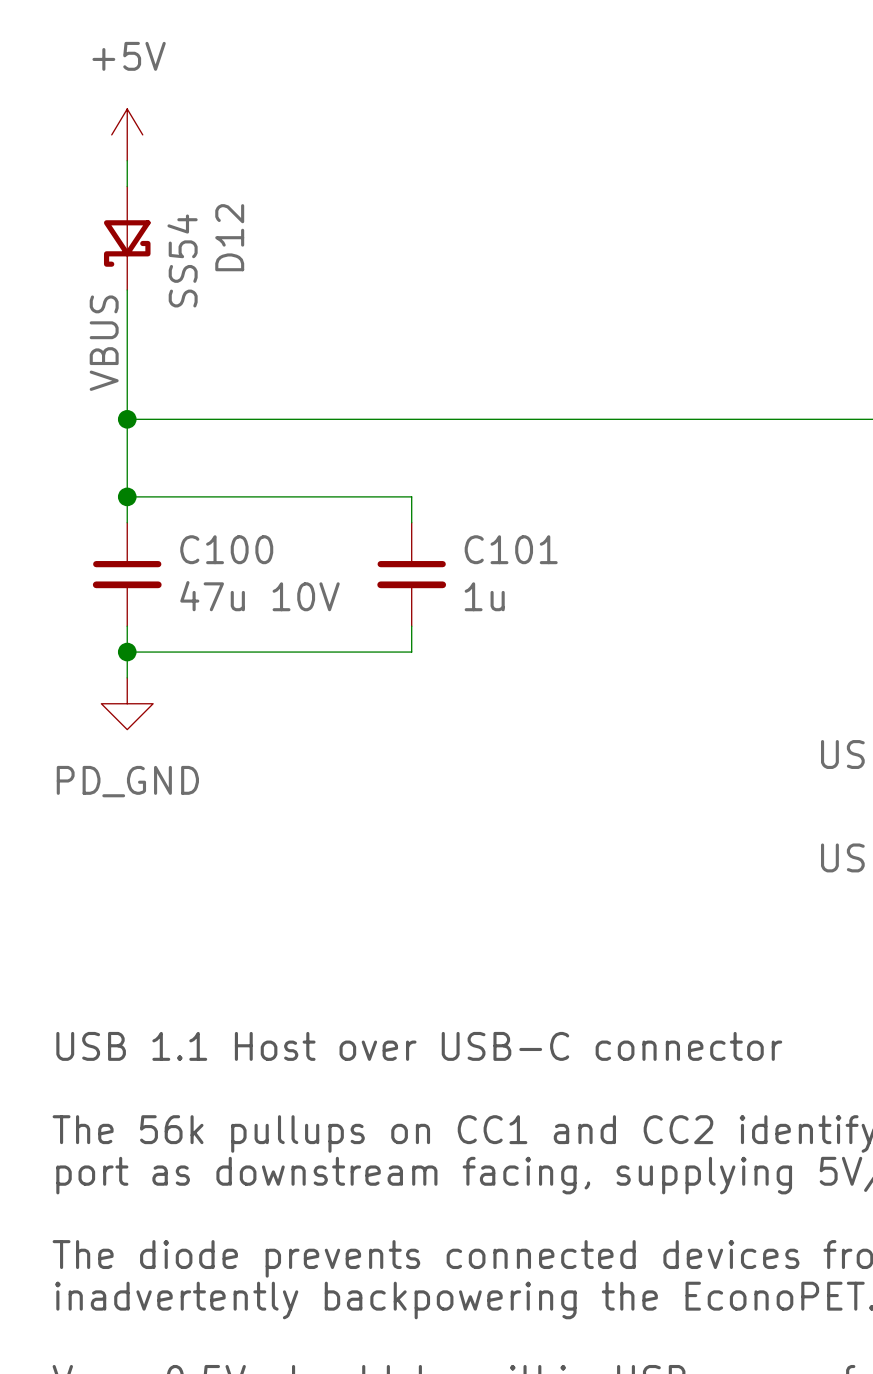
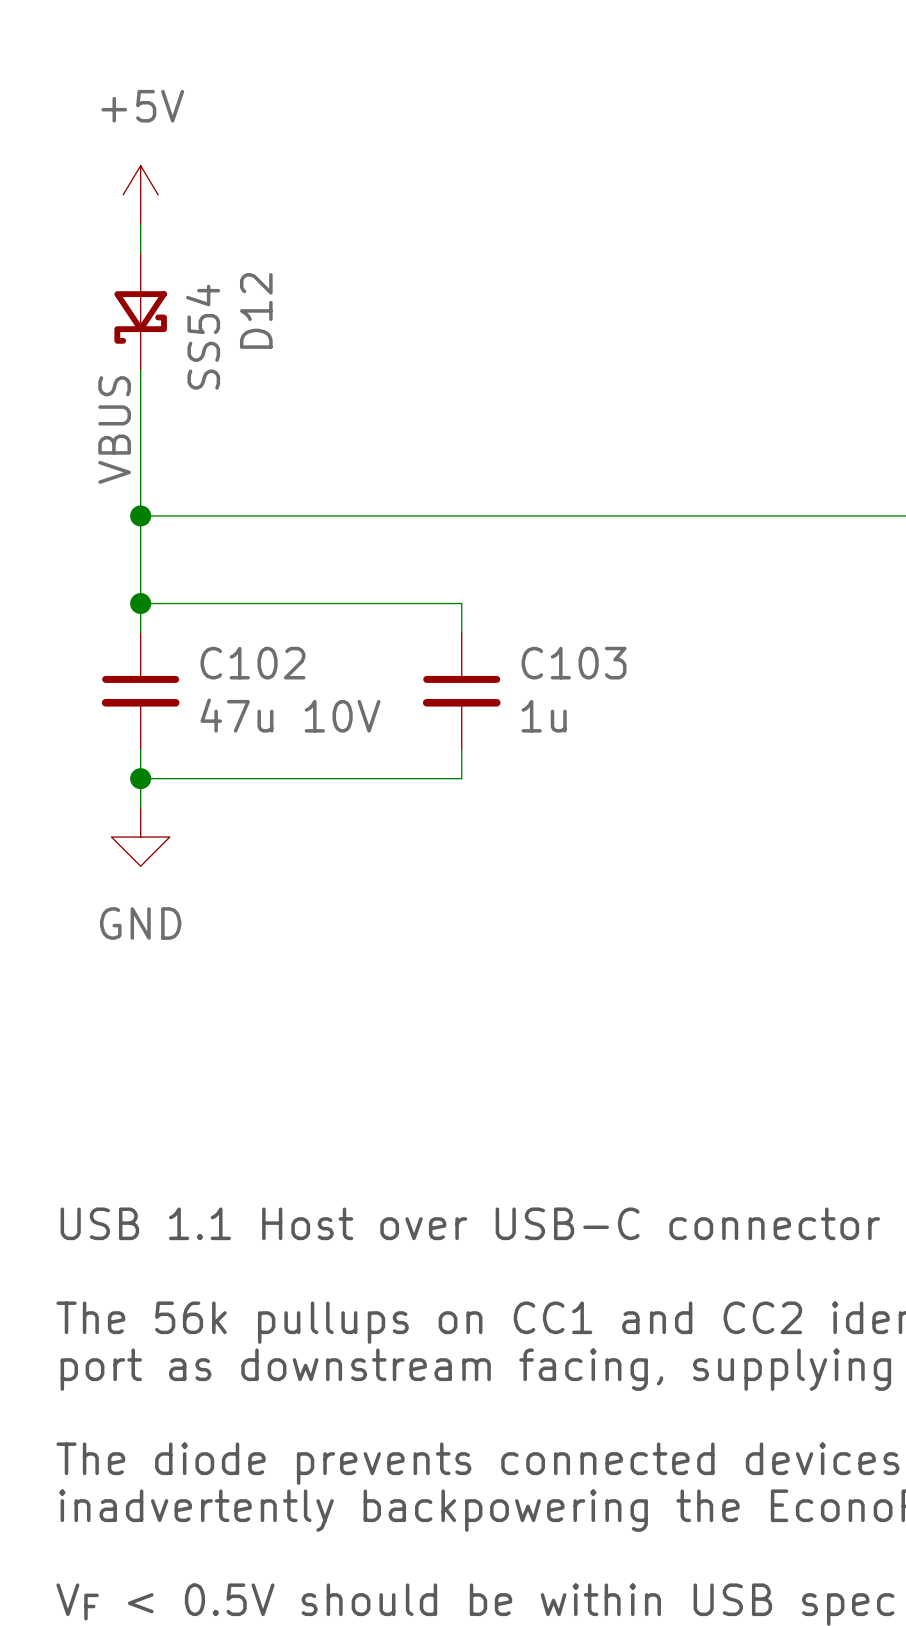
C100 name: C100 (226, 549) -> C102 (252, 663)
C101 name: C101 (511, 549) -> C103 (574, 663)
power symbol: PD_GND (127, 703) -> GND (140, 837)

